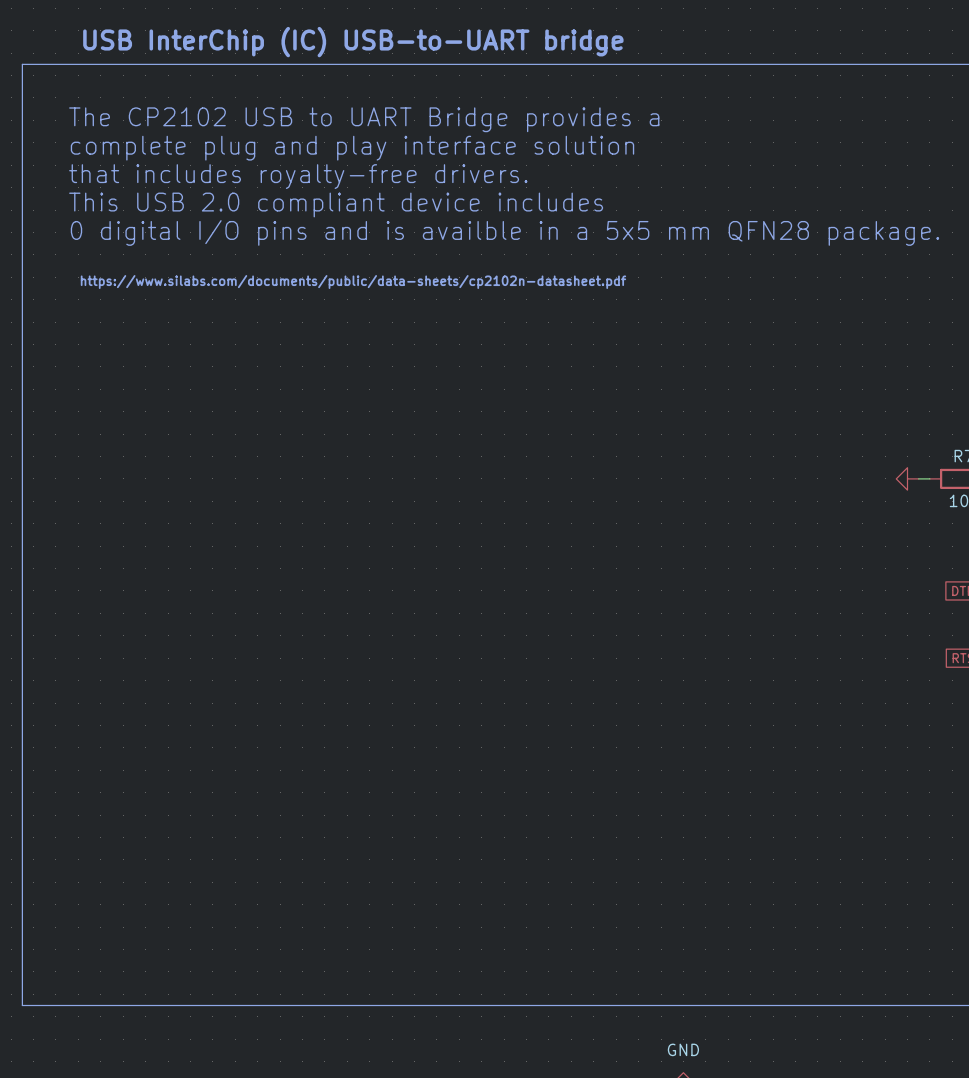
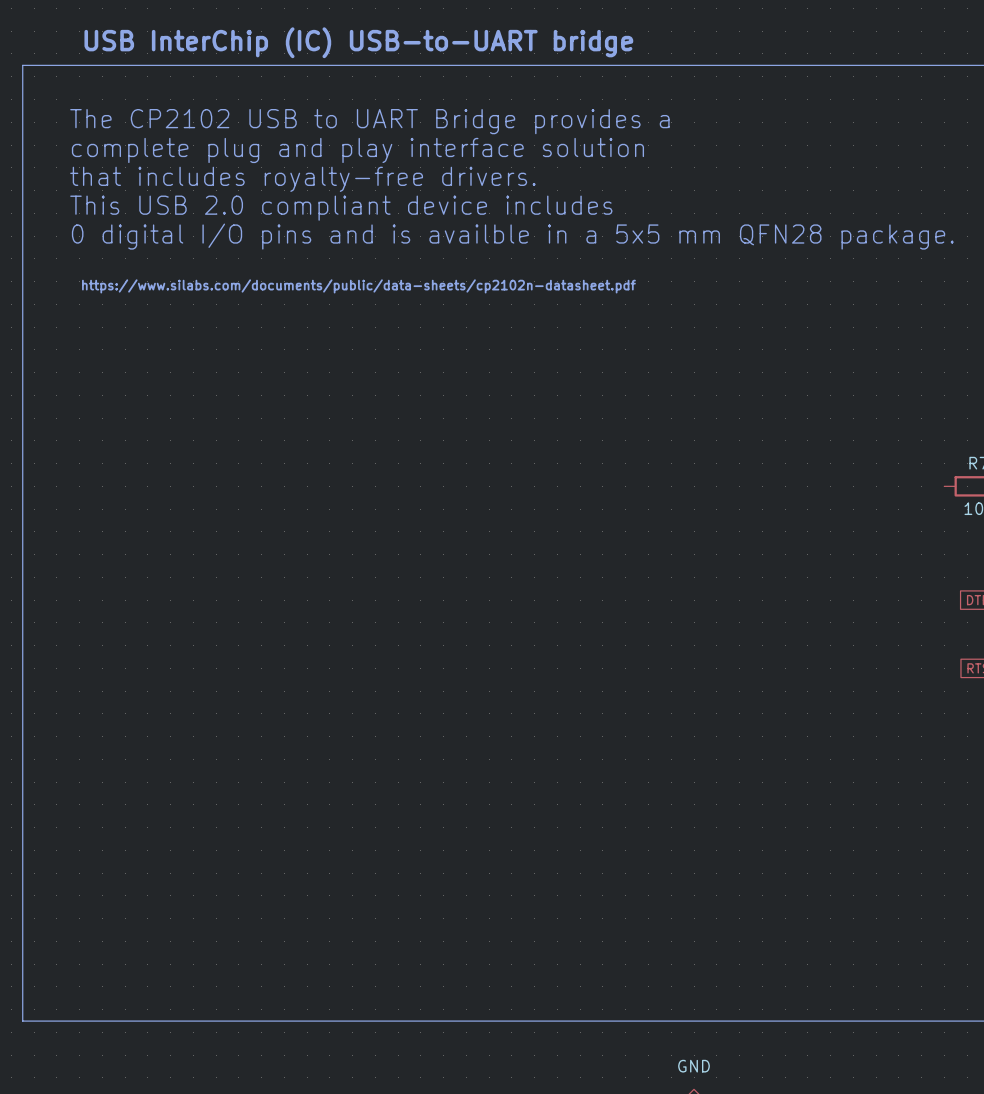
power symbol: (907, 478) -> none
wire: (918, 478) (929, 478) -> none

